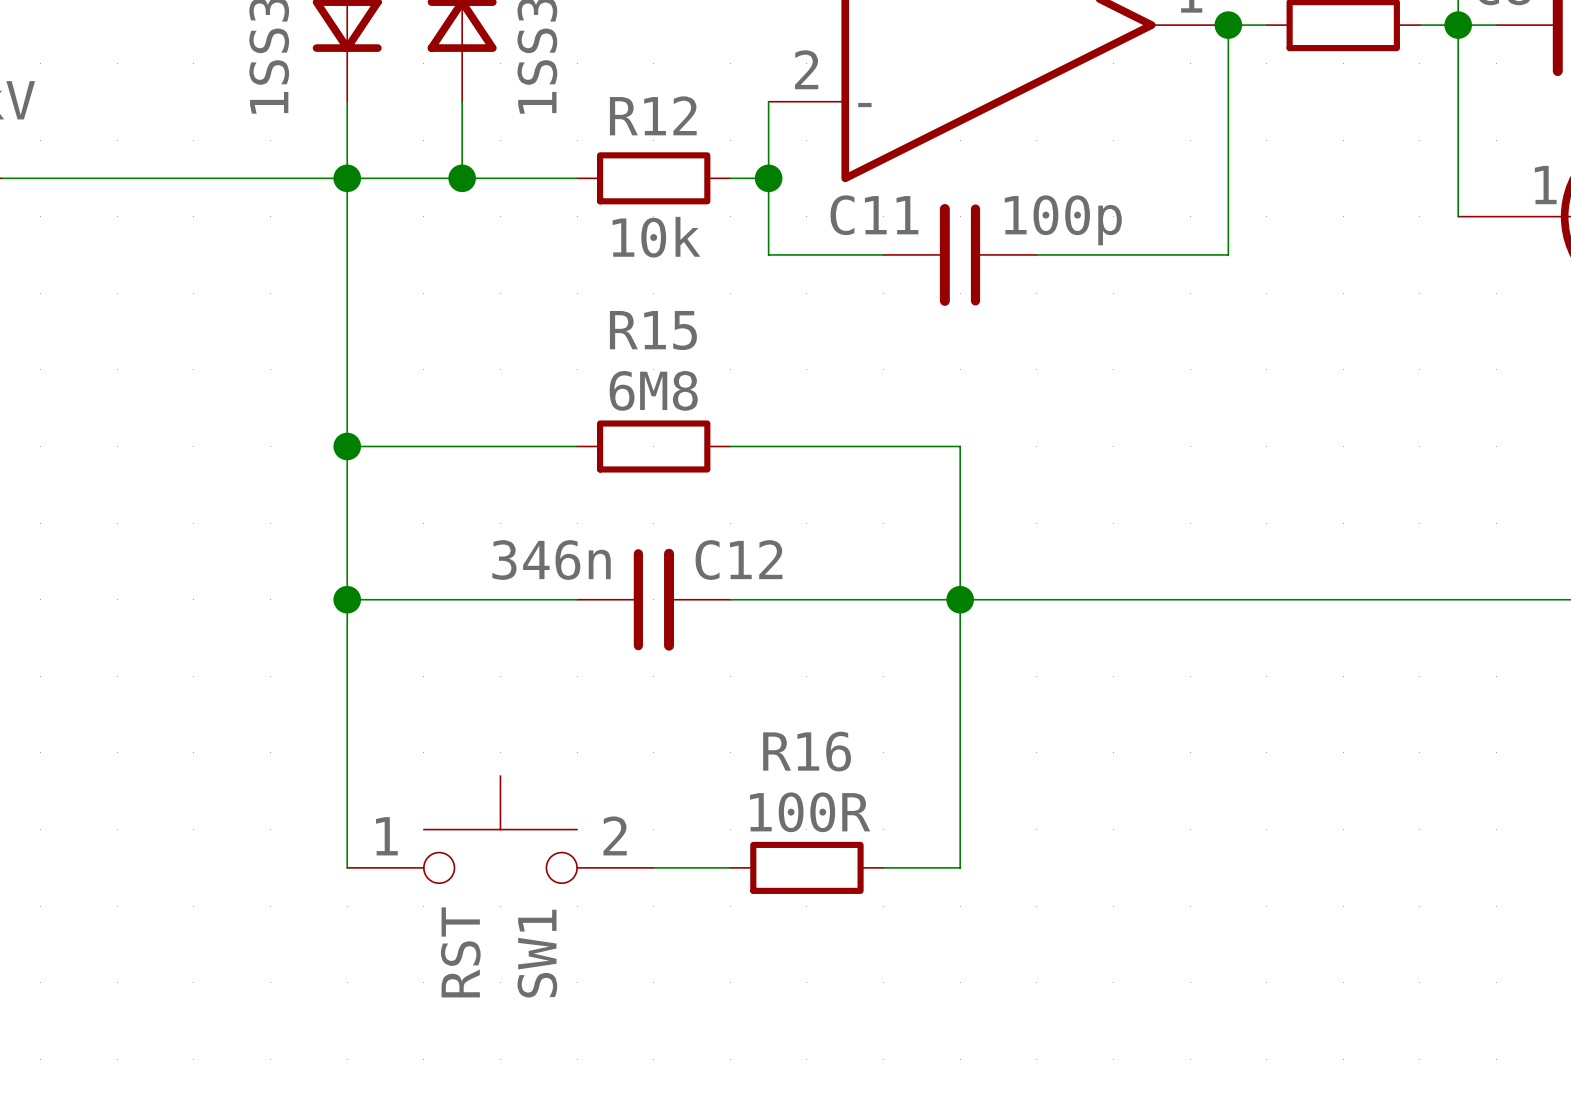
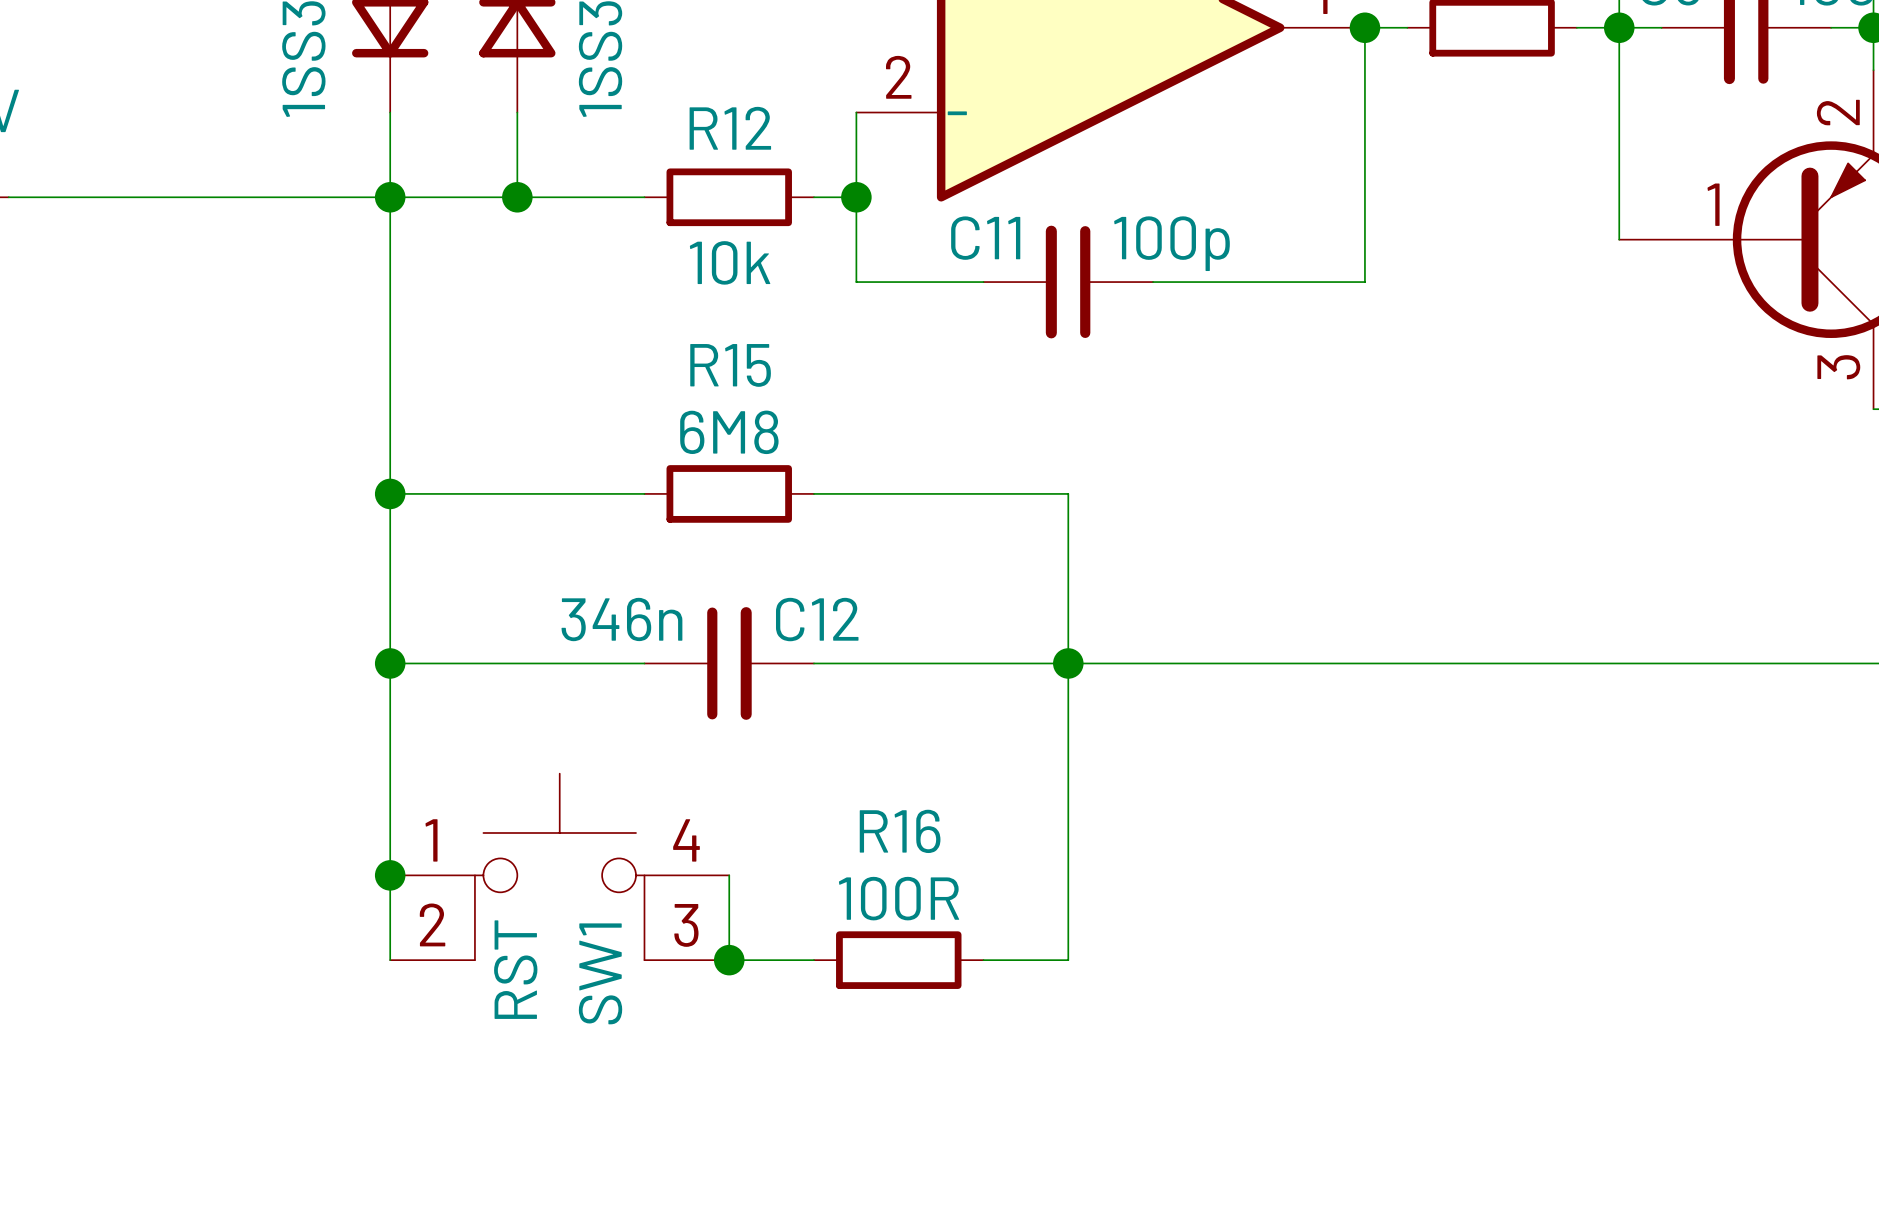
SW1 symbol: [347, 775, 654, 884] -> [390, 773, 730, 961]
junction: none -> (390, 875)
wire: none -> (729, 875) (729, 960)
junction: none -> (729, 960)

